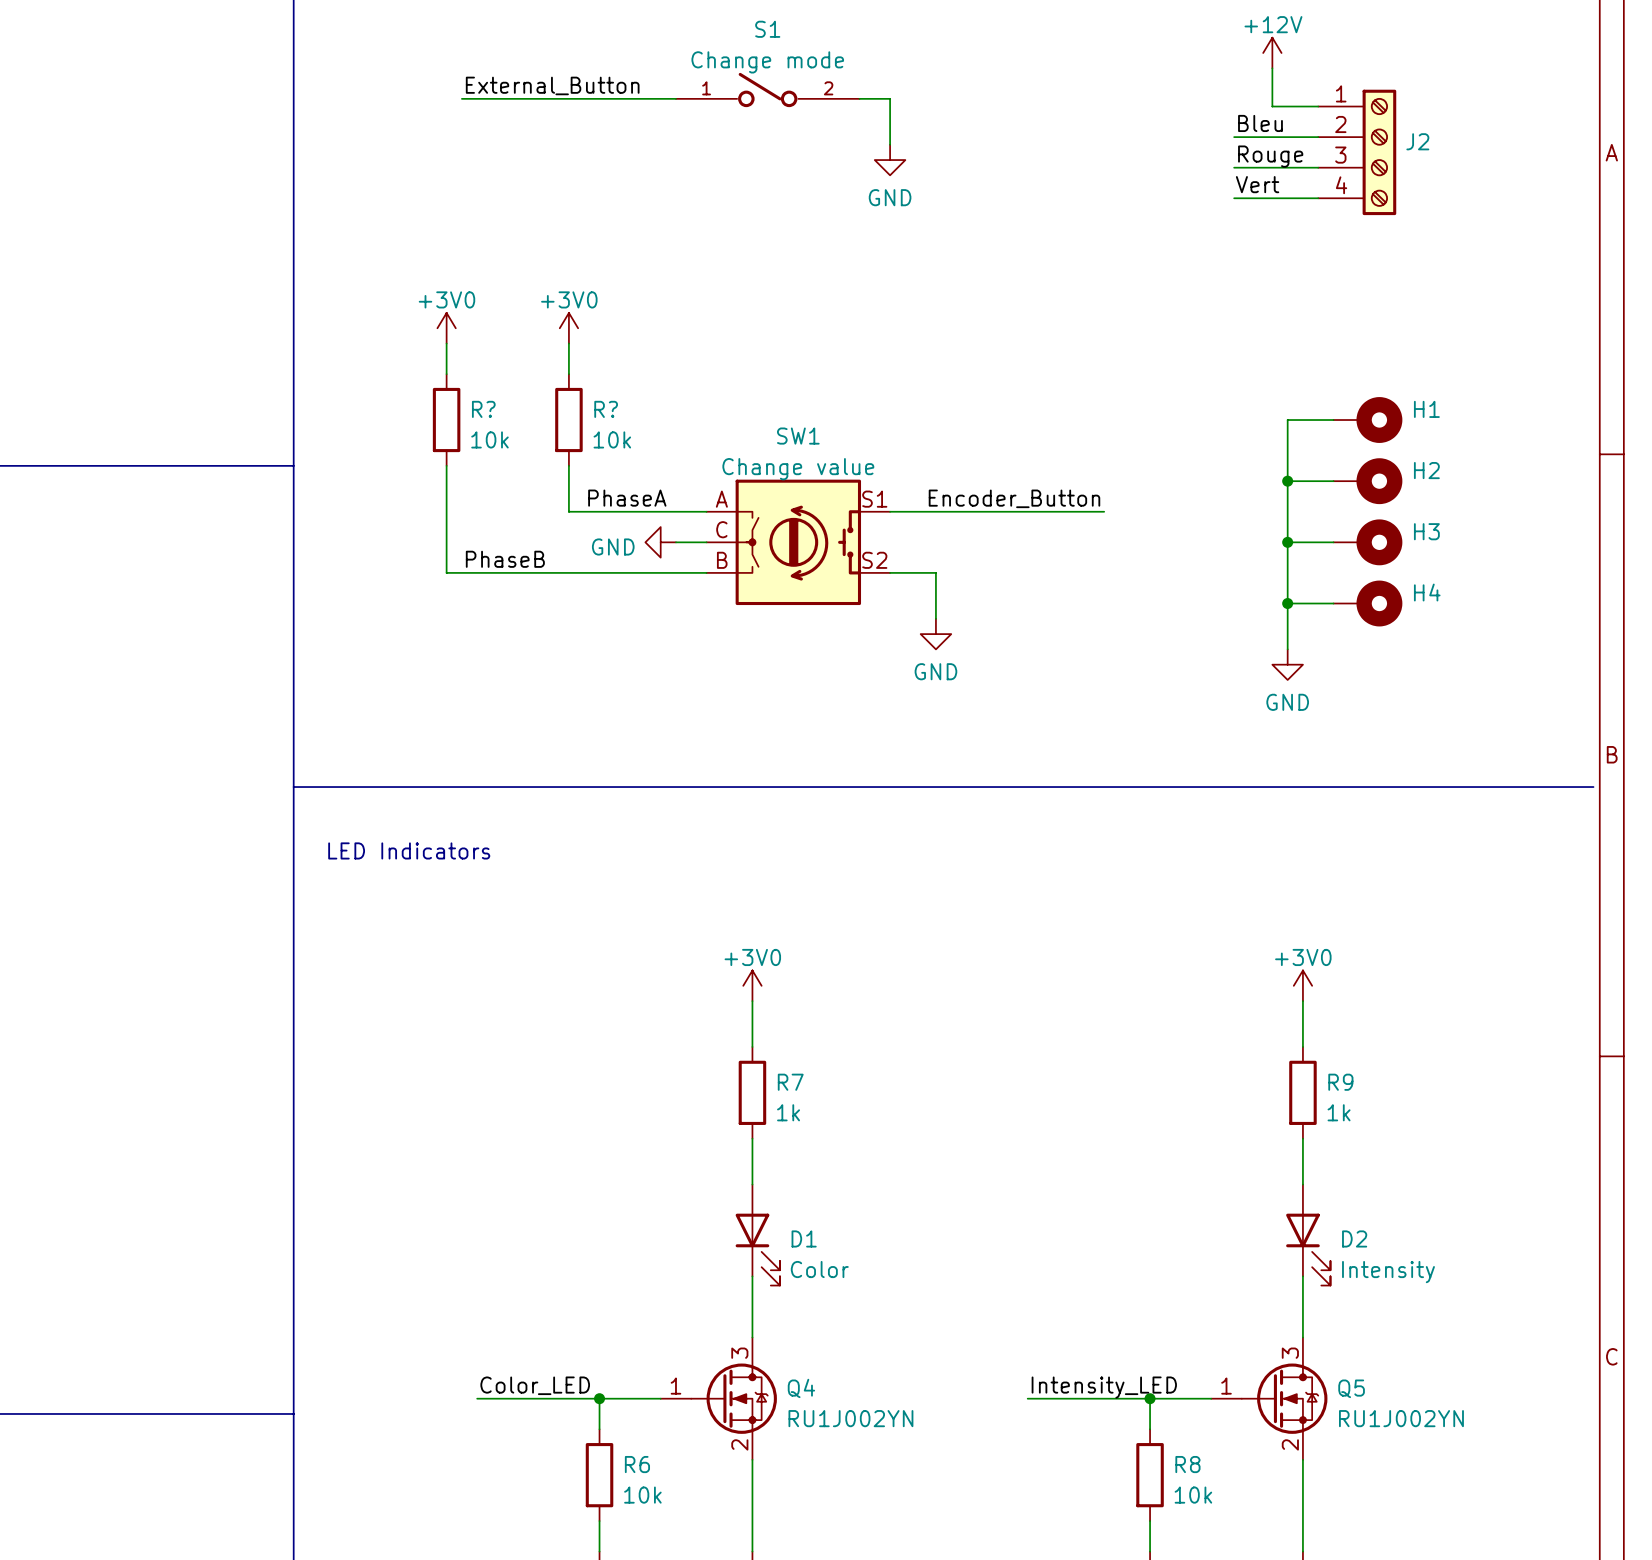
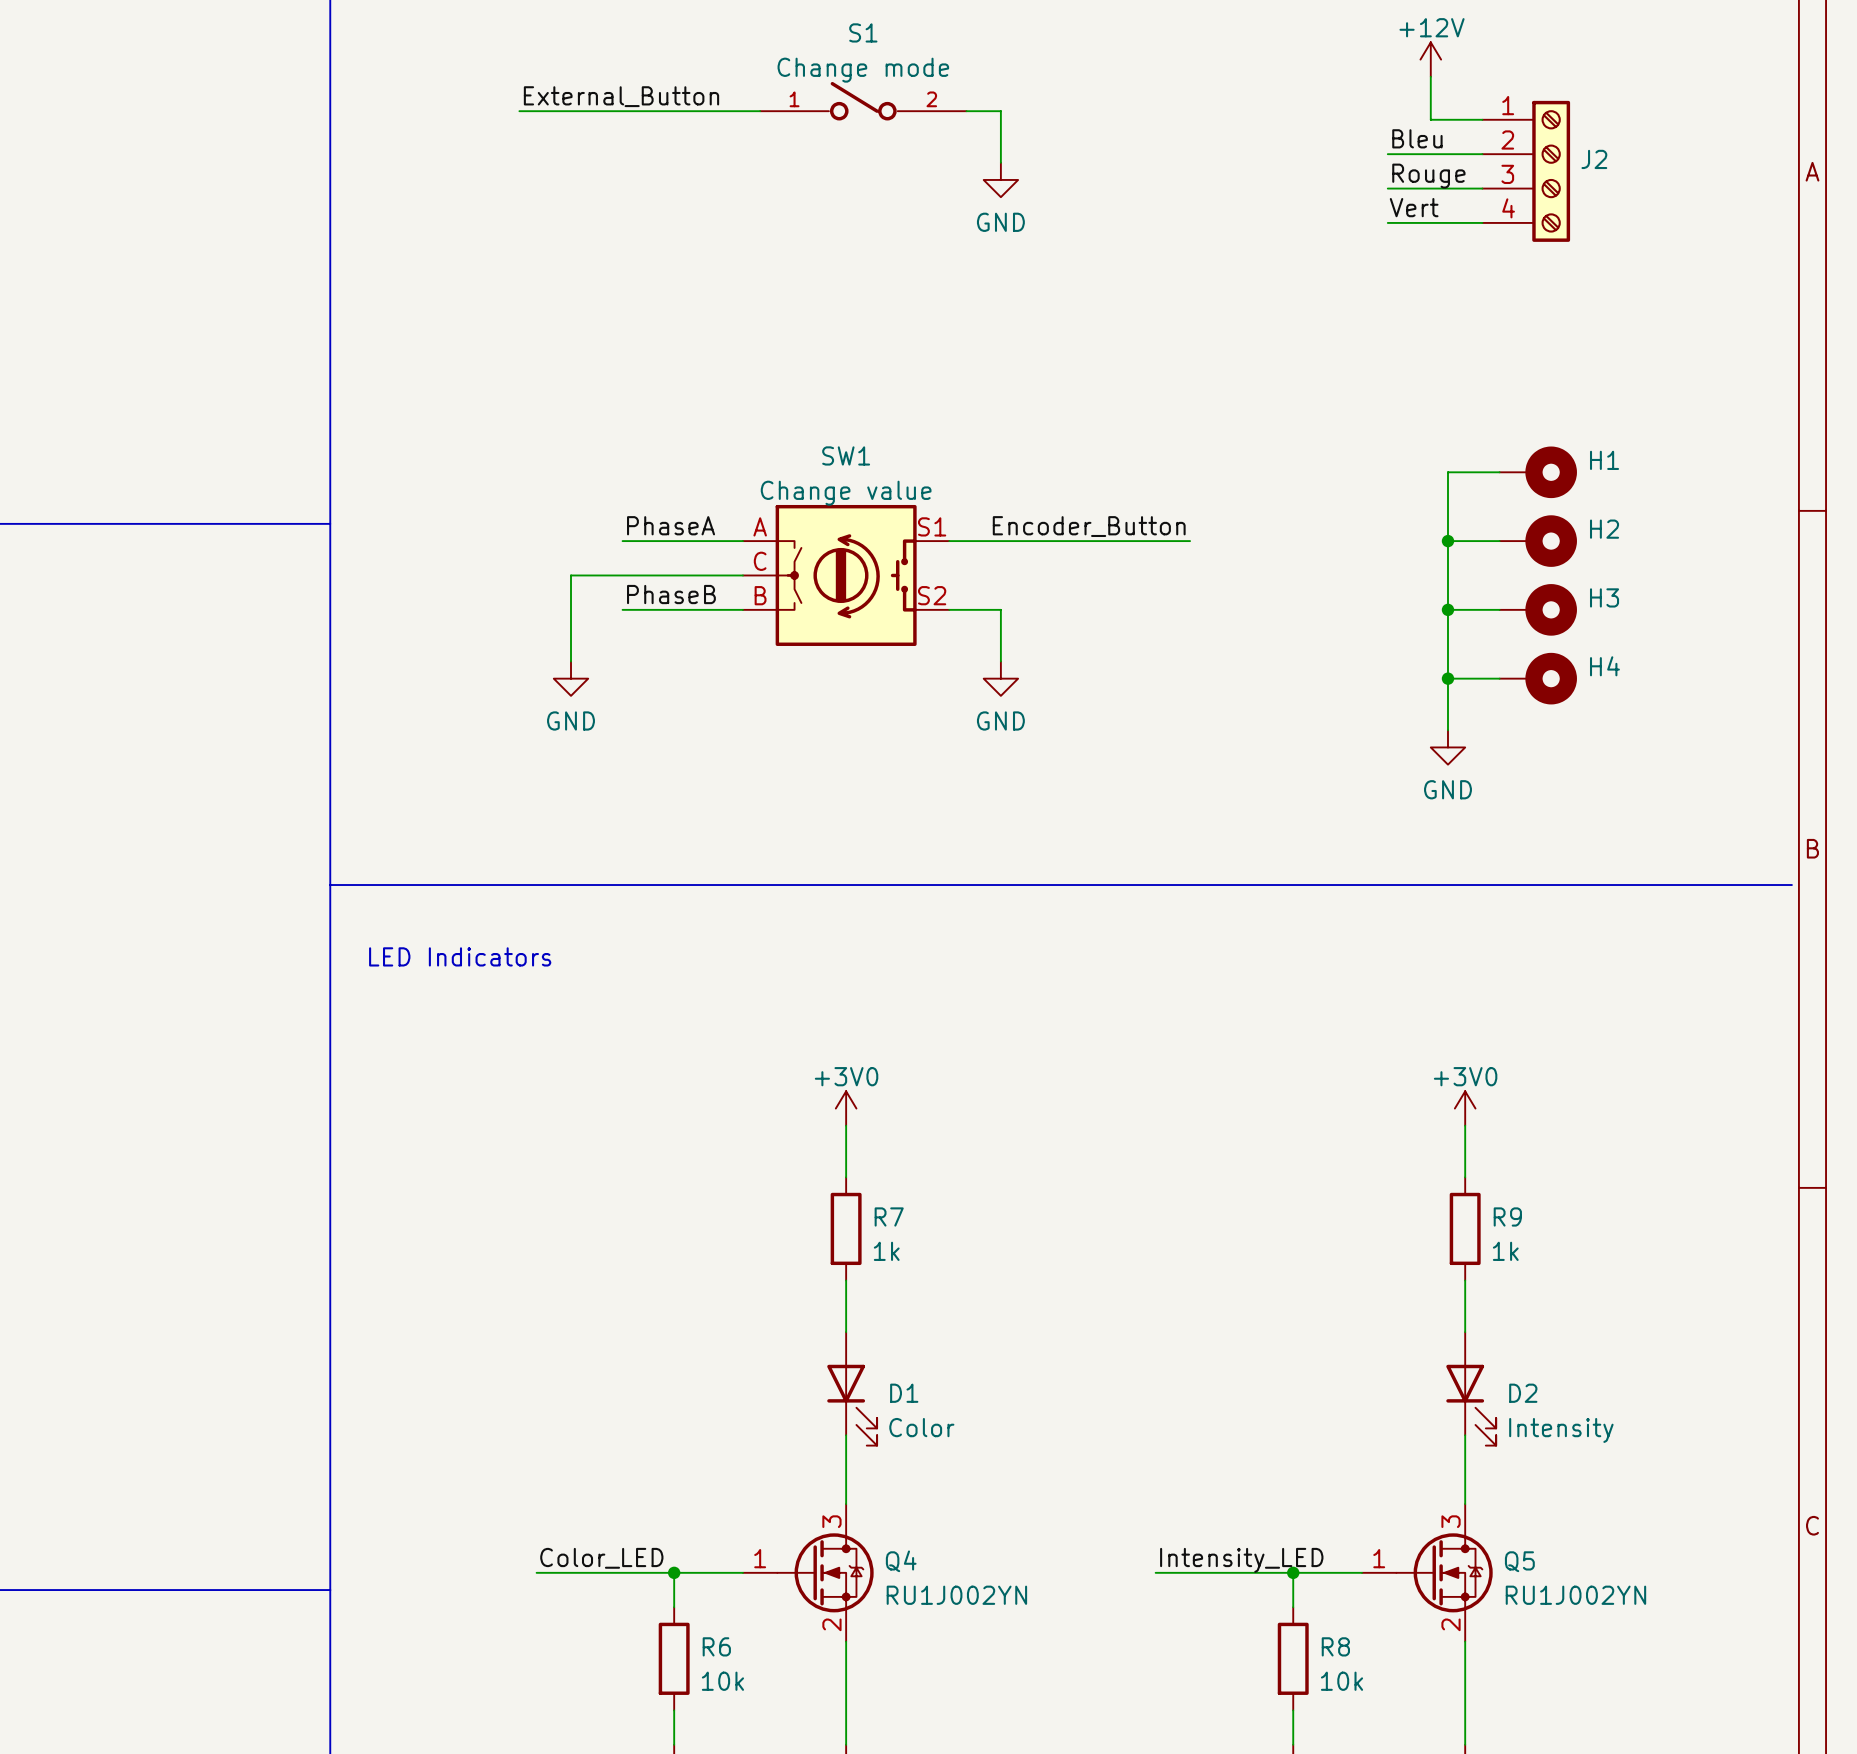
power symbol: +3V0 (446, 328) -> none
power symbol: +3V0 (568, 328) -> none
wire: (446, 343) (446, 374) -> none
wire: (568, 343) (568, 374) -> none
R?: 10k (446, 420) -> none
R?: 10k (568, 420) -> none
wire: (446, 465) (446, 572) (706, 572) -> none
wire: (568, 465) (568, 511) -> (571, 661) (571, 575) (639, 575)
wire: none -> (622, 541) (742, 541)
label position: PhaseA (627, 498) -> PhaseA (671, 525)
label position: Encoder_Button (1014, 498) -> Encoder_Button (1089, 526)
wire: (890, 511) (1104, 511) -> (949, 541) (1190, 541)
wire: none -> (622, 609) (742, 609)
power symbol: GND (660, 542) -> none
SW1 position: (798, 542) -> (846, 575)
label position: PhaseB (505, 559) -> PhaseB (671, 594)
wire: (890, 572) (935, 572) (935, 618) -> (949, 609) (1000, 609) (1000, 661)
power symbol: none -> GND (571, 678)
power symbol position: GND (935, 634) -> GND (1000, 678)

